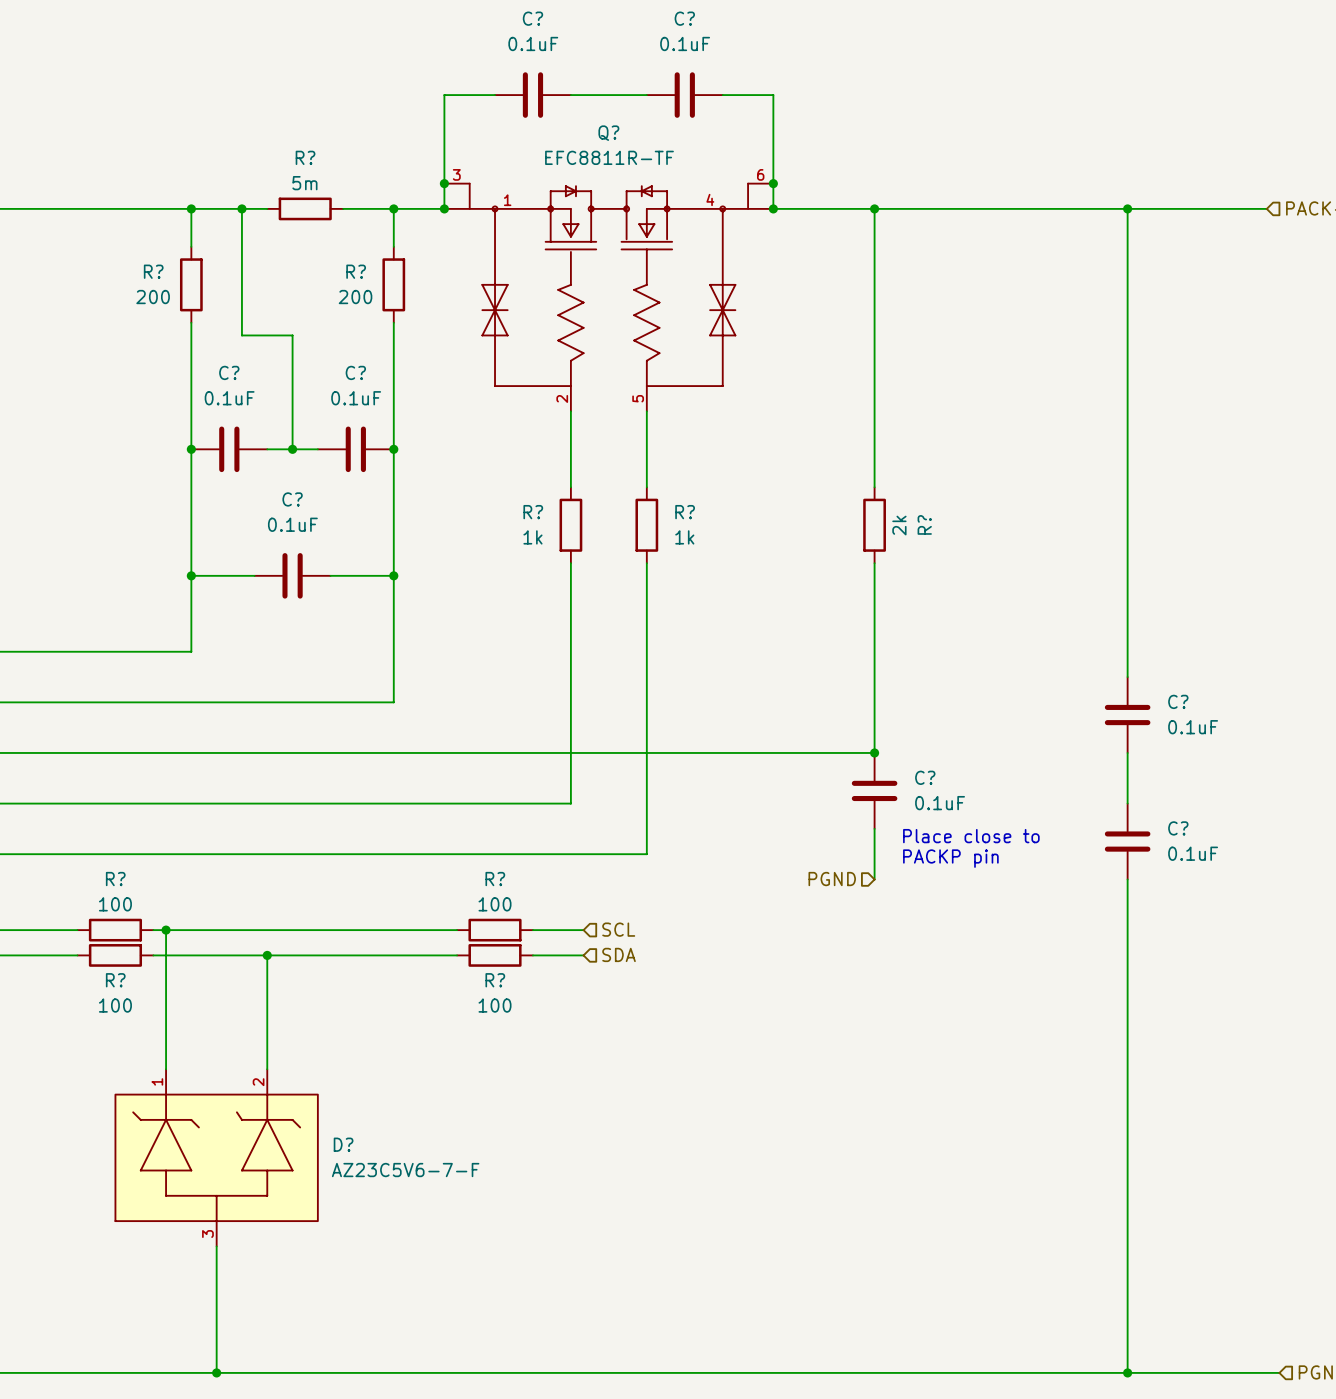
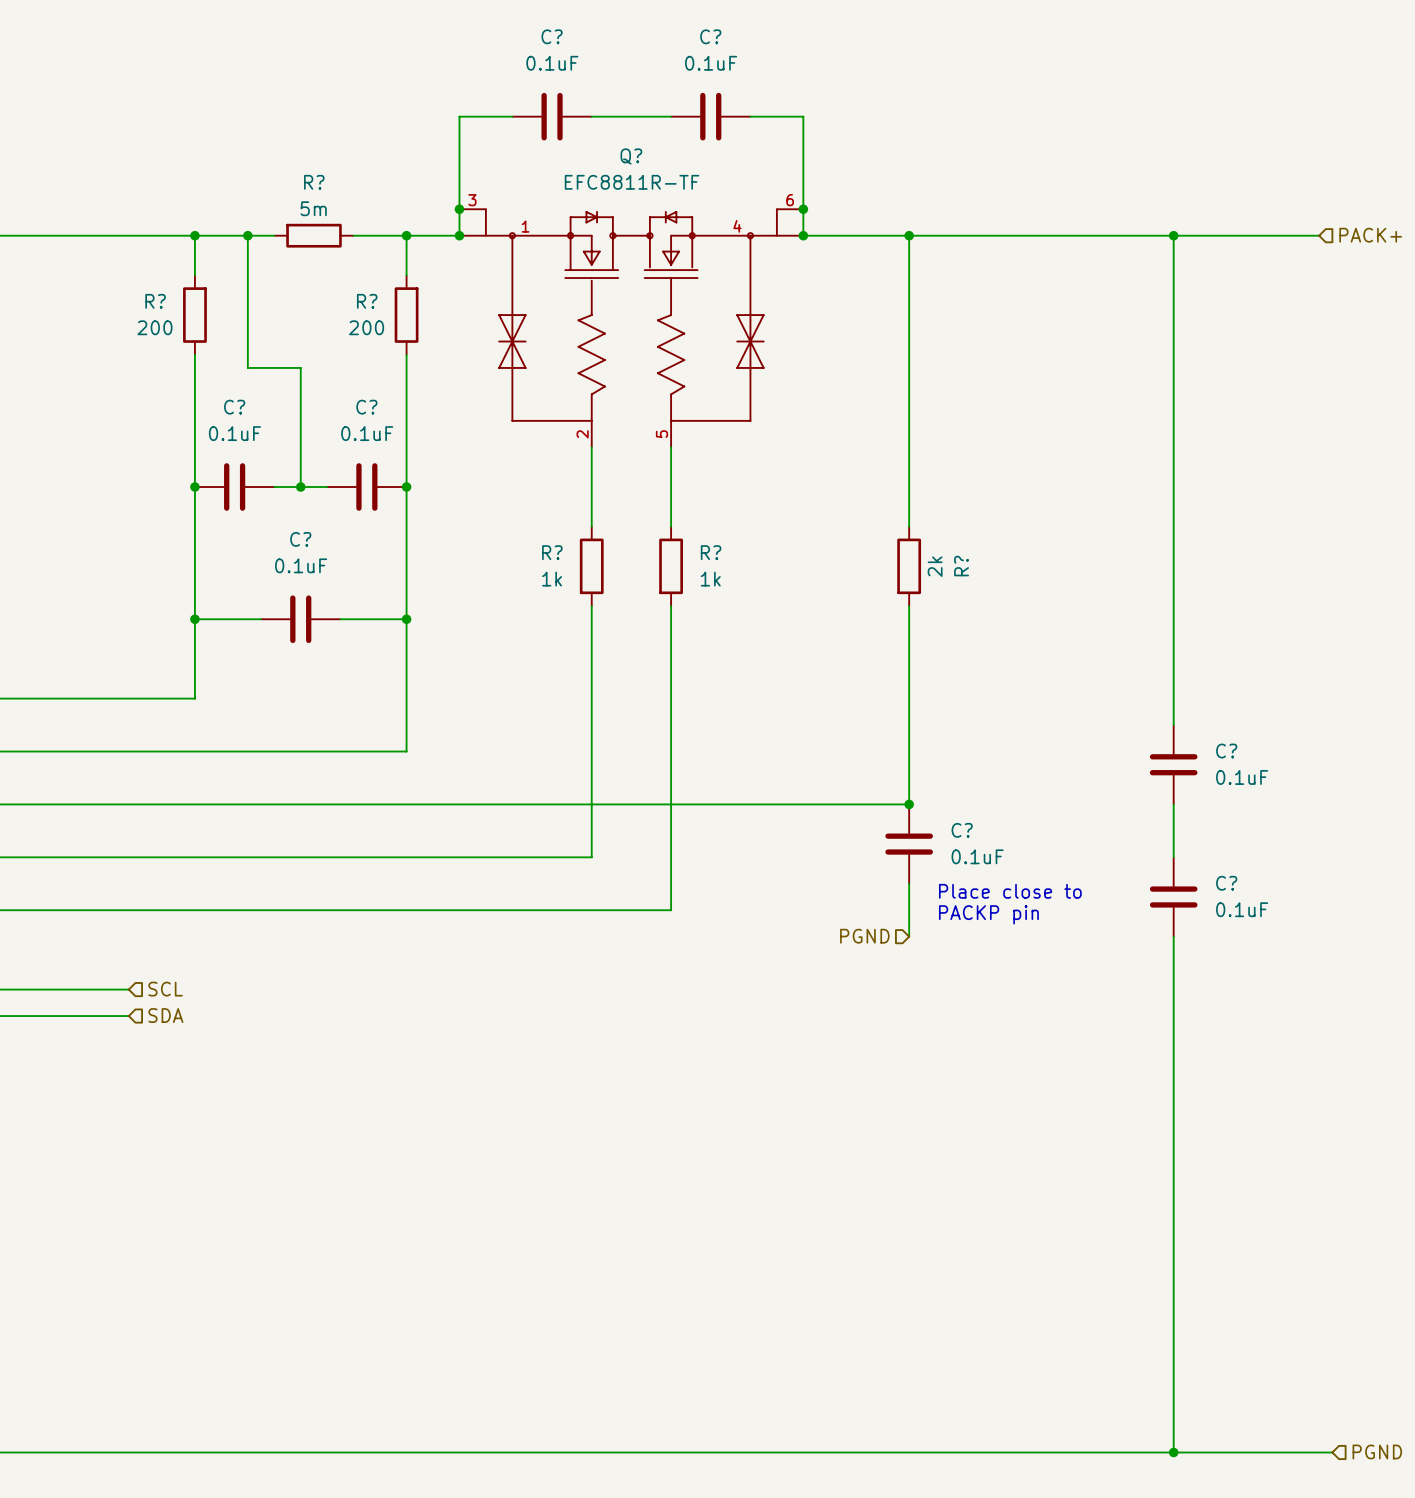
hierarchical label: none -> SCL (165, 989)
hierarchical label: SCL (618, 929) -> none
wire: none -> (75, 989) (128, 989)
R?: 100 (115, 930) -> none
wire: (153, 930) (457, 930) -> none
wire: (166, 930) (166, 1069) -> none
junction: (166, 930) -> none
R?: 100 (495, 930) -> none
wire: (532, 930) (583, 930) -> none
hierarchical label: none -> SDA (165, 1015)
hierarchical label: SDA (619, 954) -> none
wire: none -> (75, 1016) (128, 1016)
R?: 100 (115, 955) -> none
wire: (153, 955) (457, 955) -> none
wire: (267, 955) (267, 1069) -> none
junction: (267, 955) -> none
R?: 100 (495, 955) -> none
wire: (532, 955) (583, 955) -> none
D?: AZ23C5V6-7-F (216, 1157) -> none
wire: (216, 1246) (216, 1372) -> none
junction: (216, 1372) -> none

